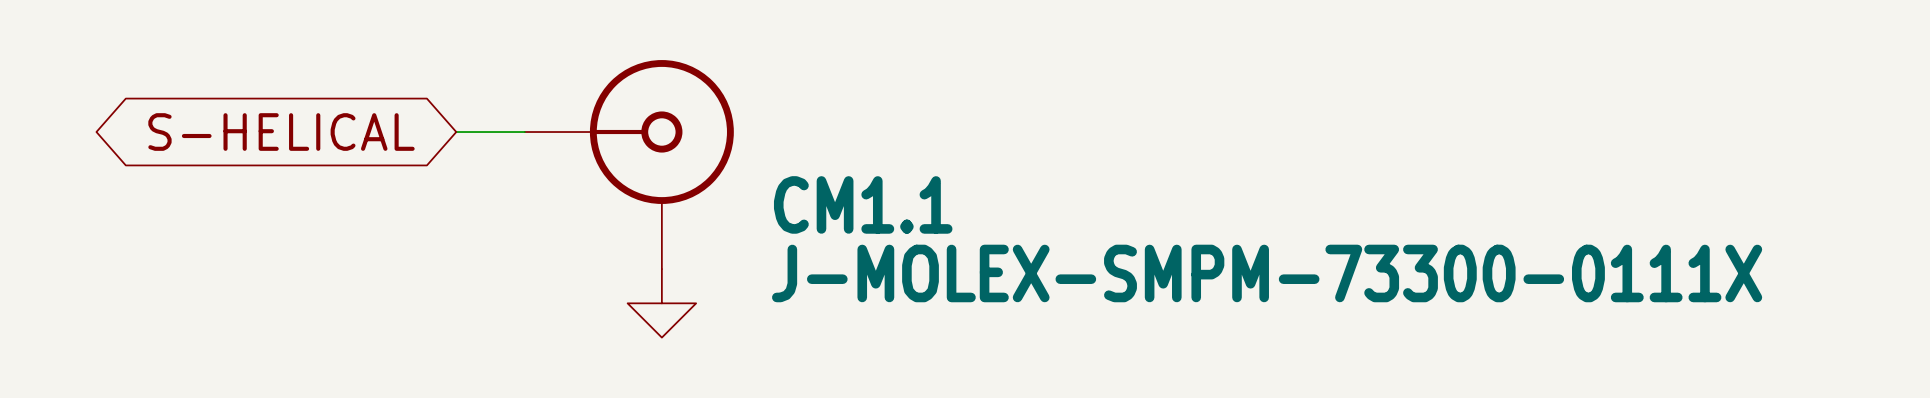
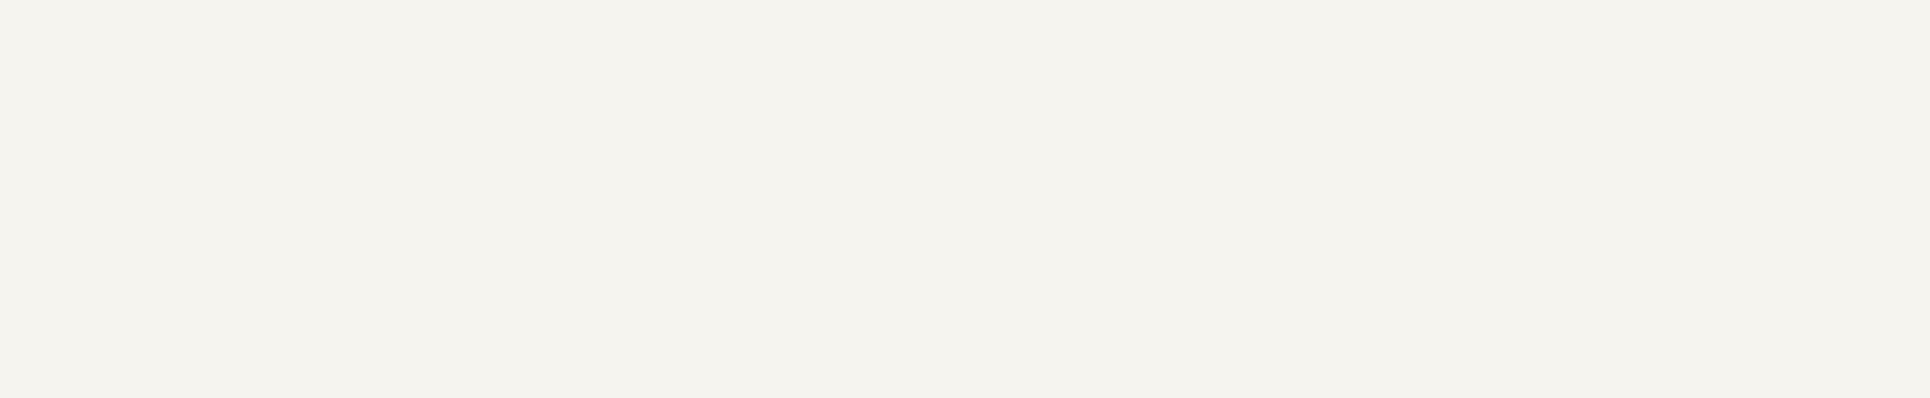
global label: S-HELICAL (281, 132) -> none
wire: (456, 132) (524, 132) -> none
CM1.1: J-MOLEX-SMPM-73300-0111X (629, 164) -> none
power symbol: (661, 303) -> none

